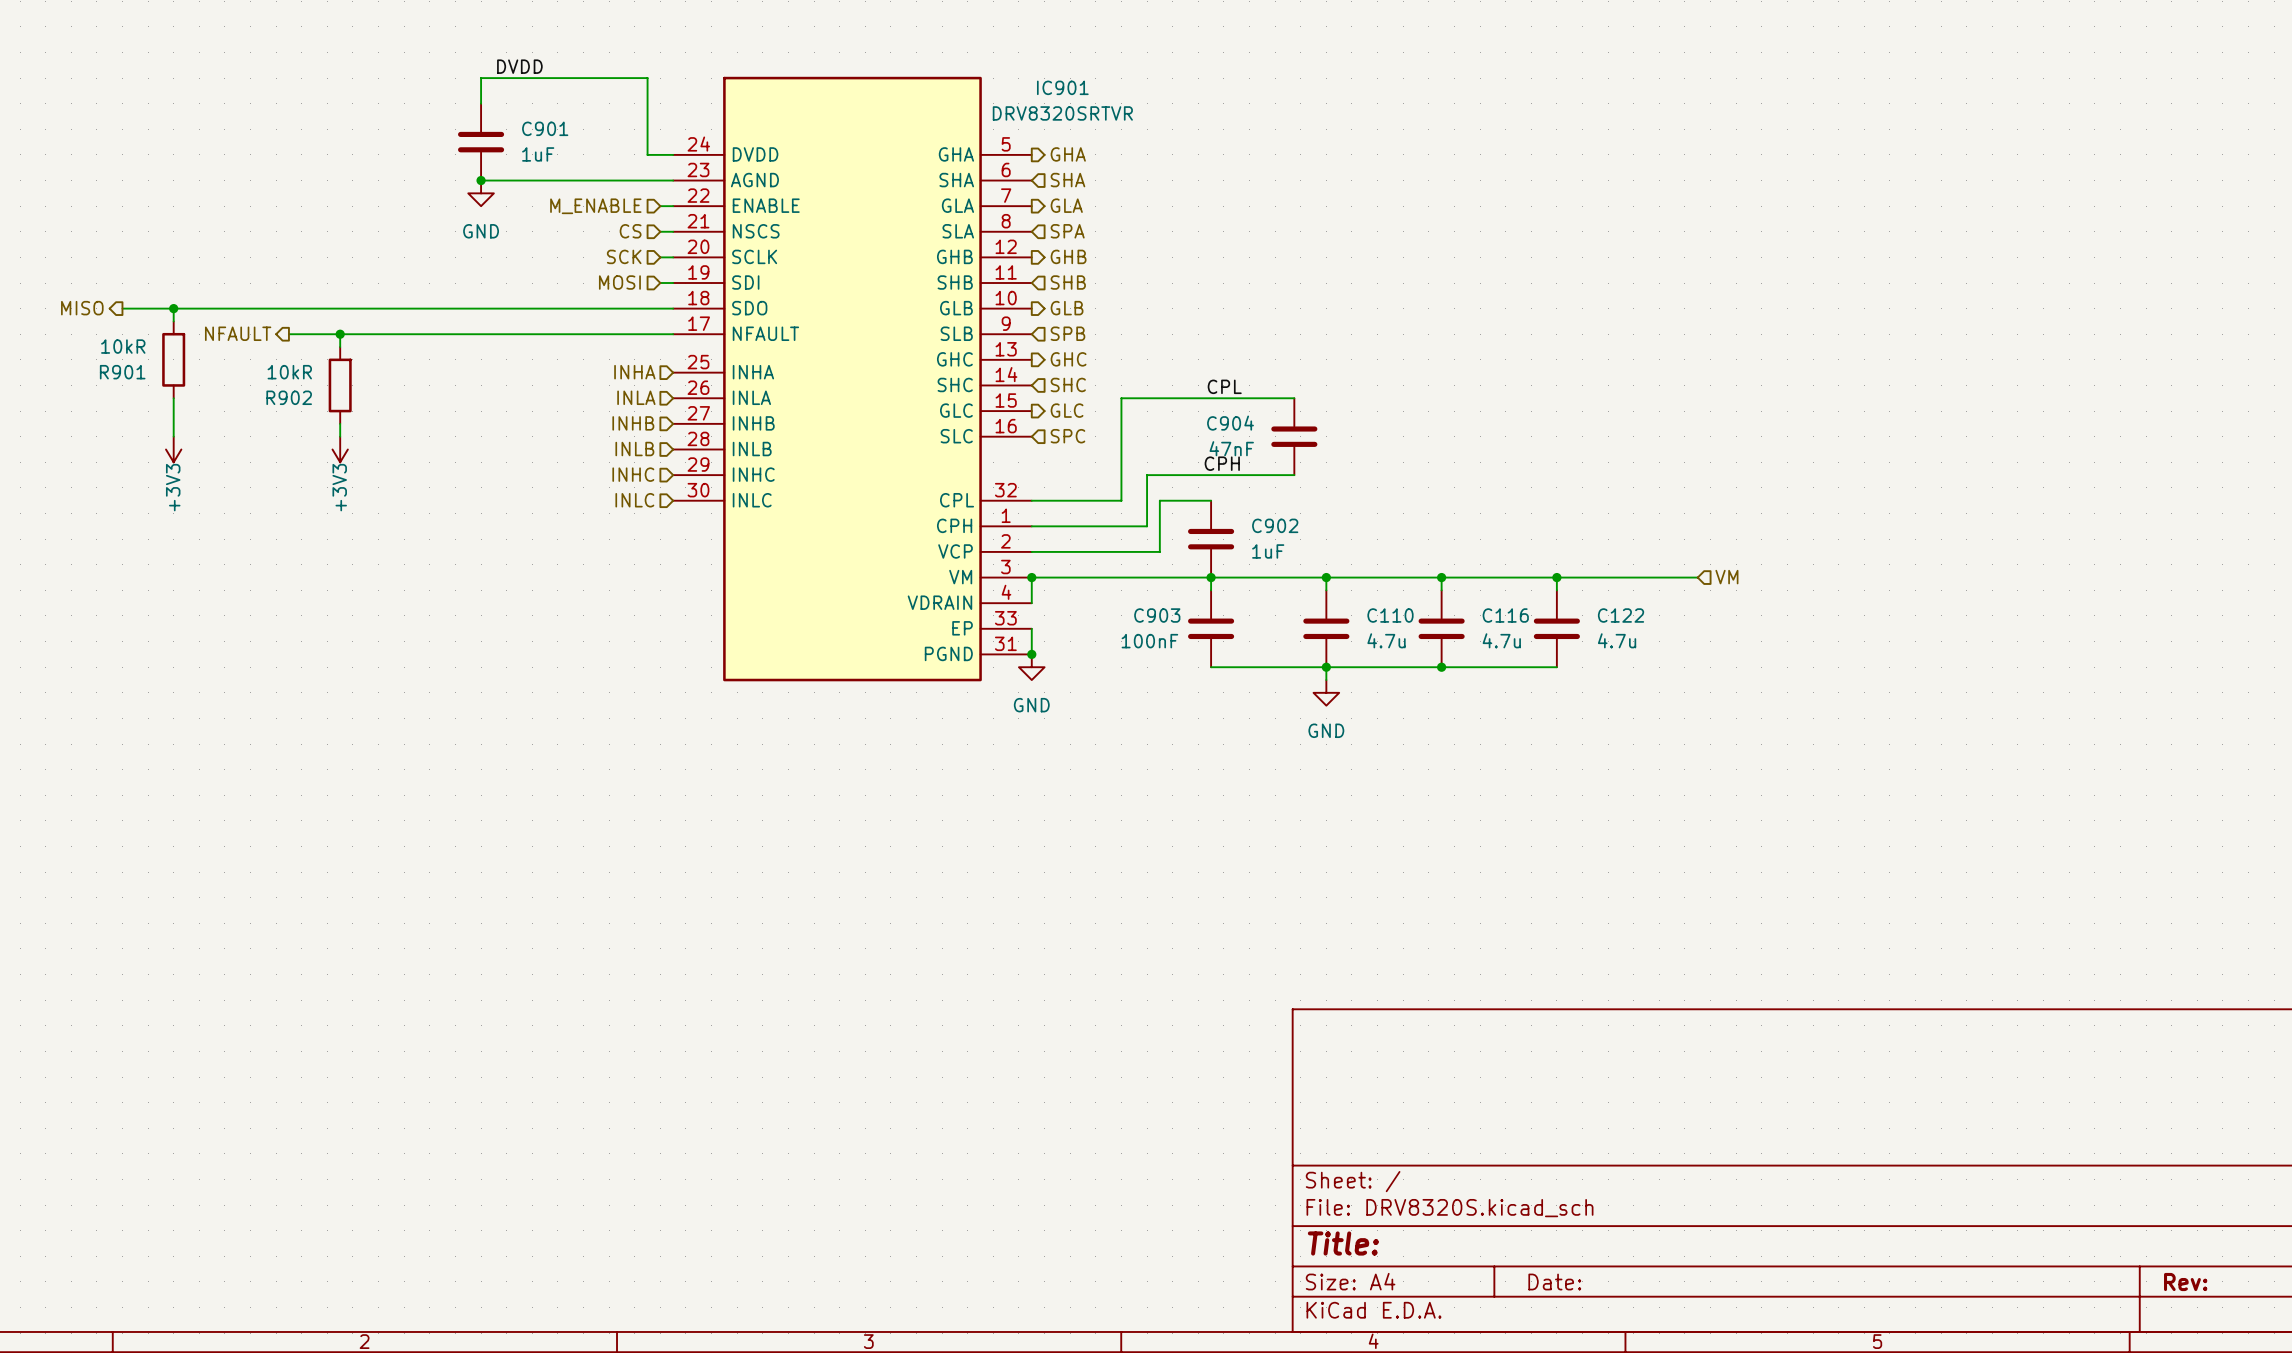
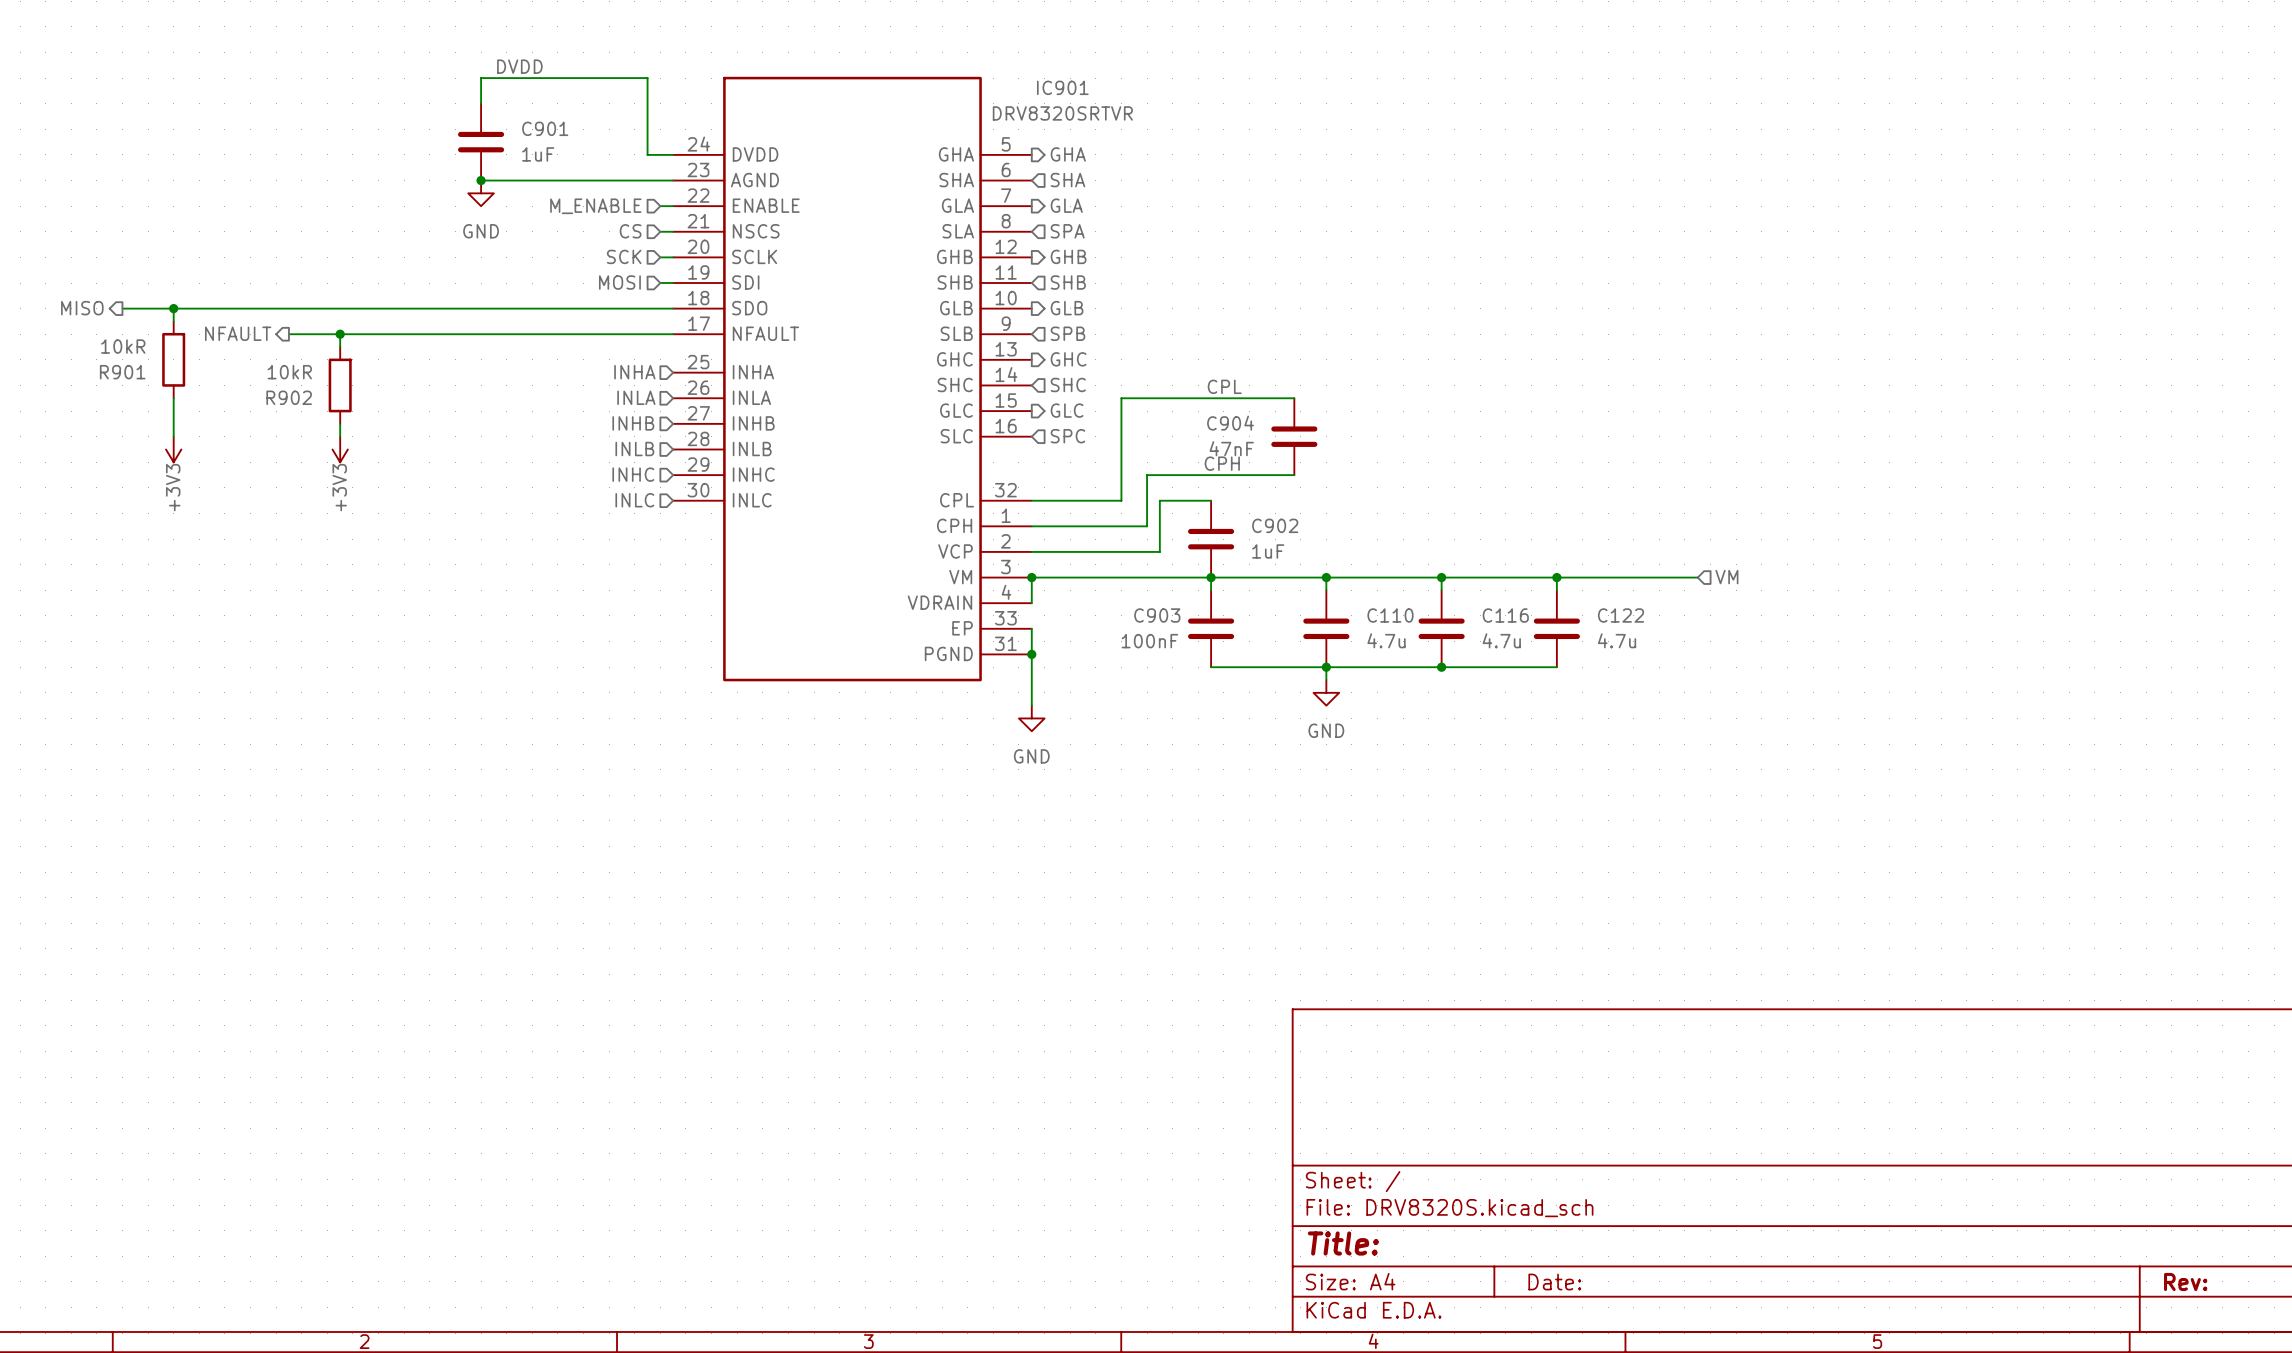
wire: none -> (1031, 654) (1031, 705)
power symbol position: GND (1031, 667) -> GND (1031, 718)

